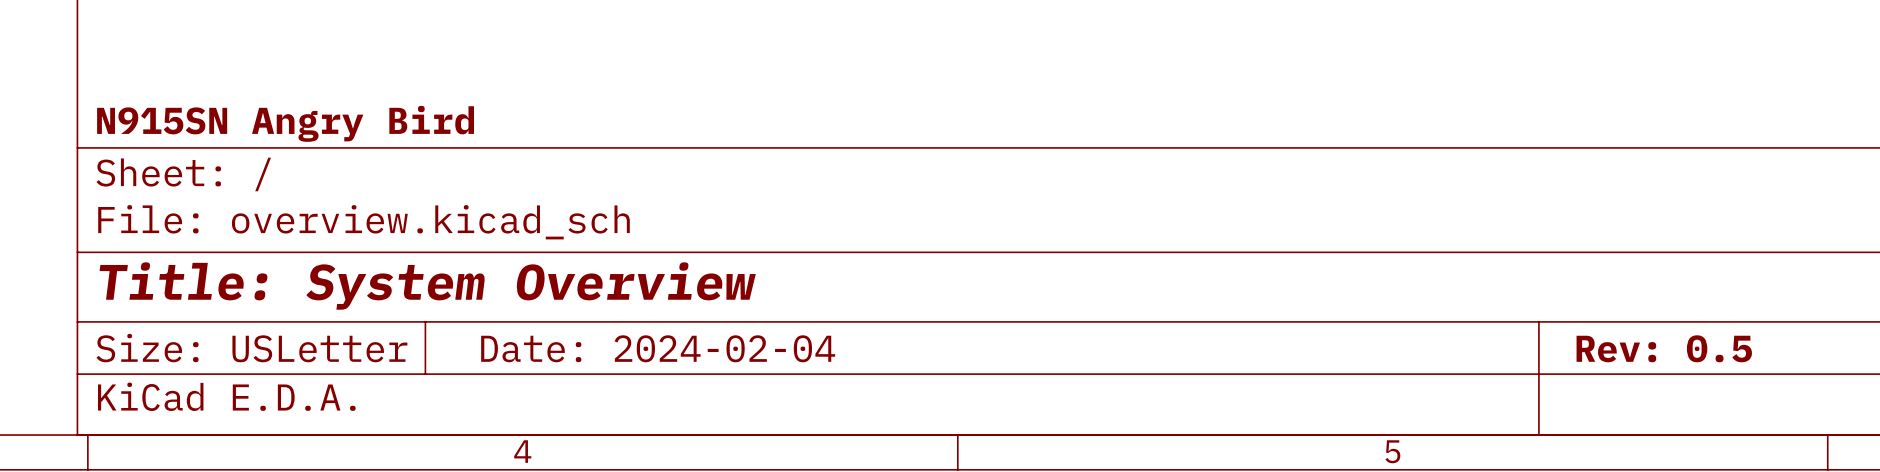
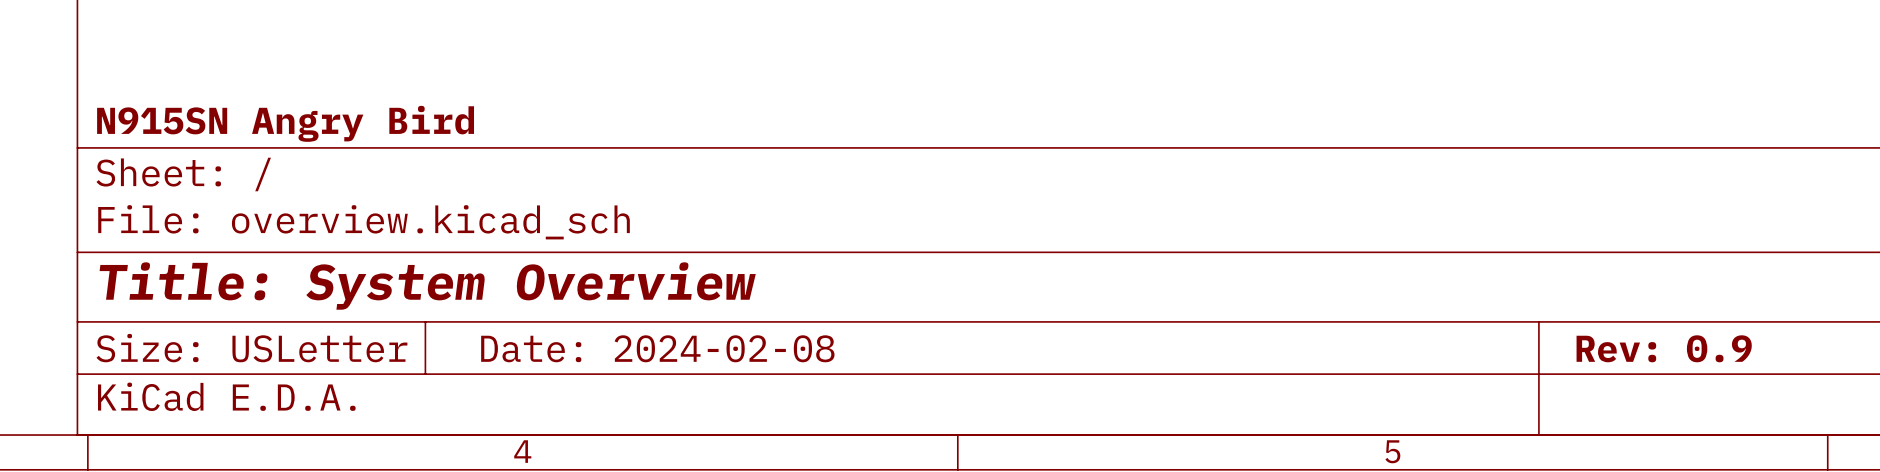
title block: Date: 2024-02-04 (658, 348) -> Date: 2024-02-08 (657, 348)
title block: Rev: 0.5 (1664, 348) -> Rev: 0.9 (1664, 348)

